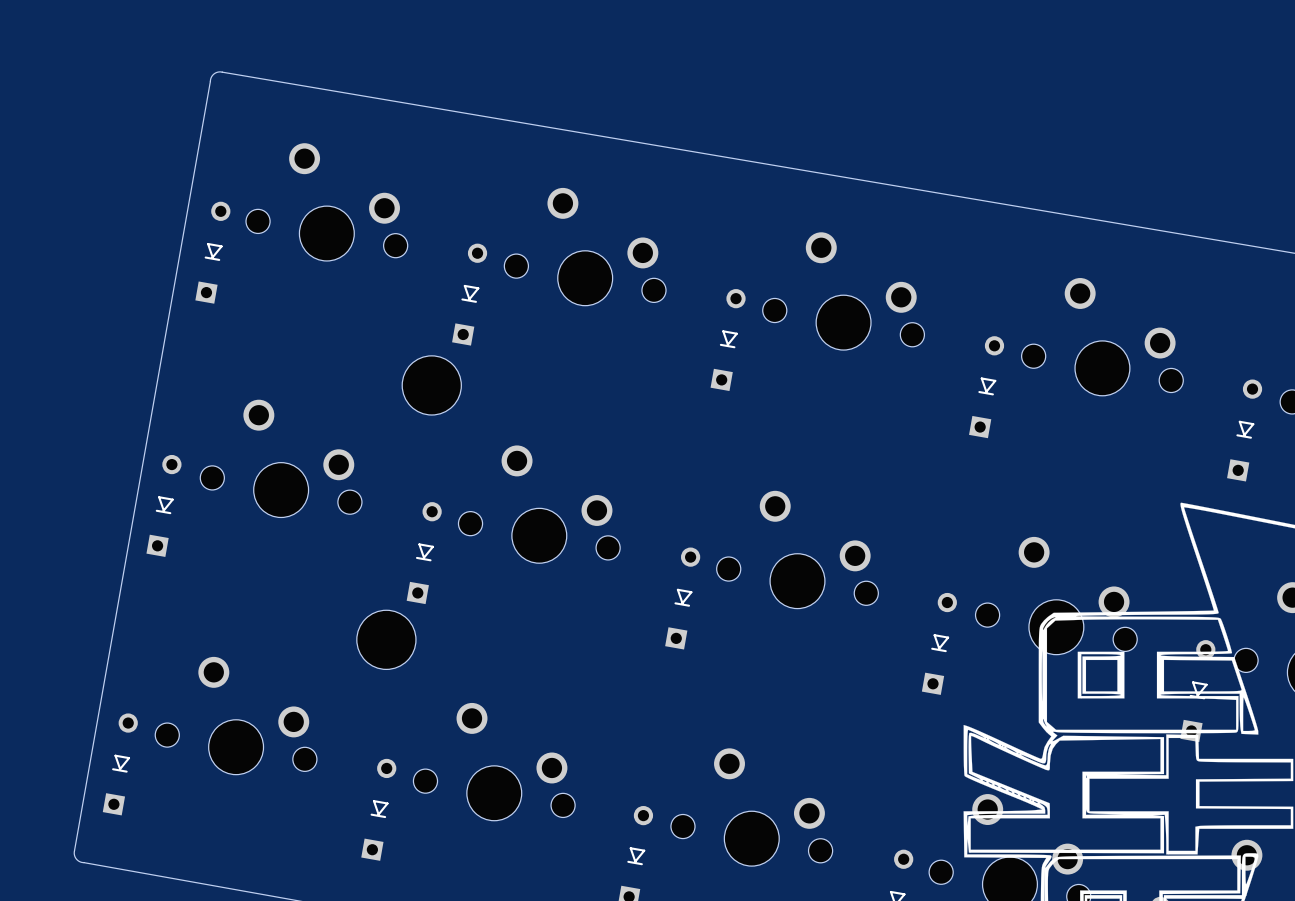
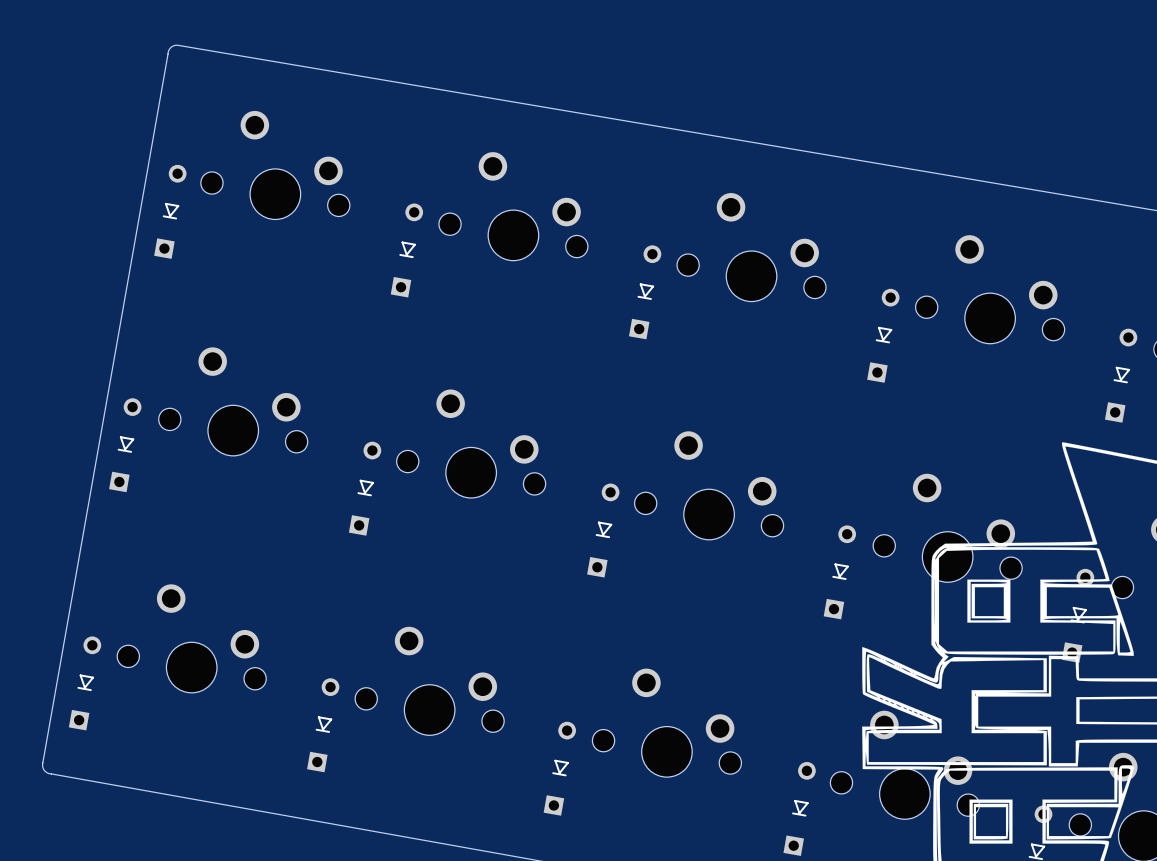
part: (431, 385) -> none
part: (386, 639) -> none

